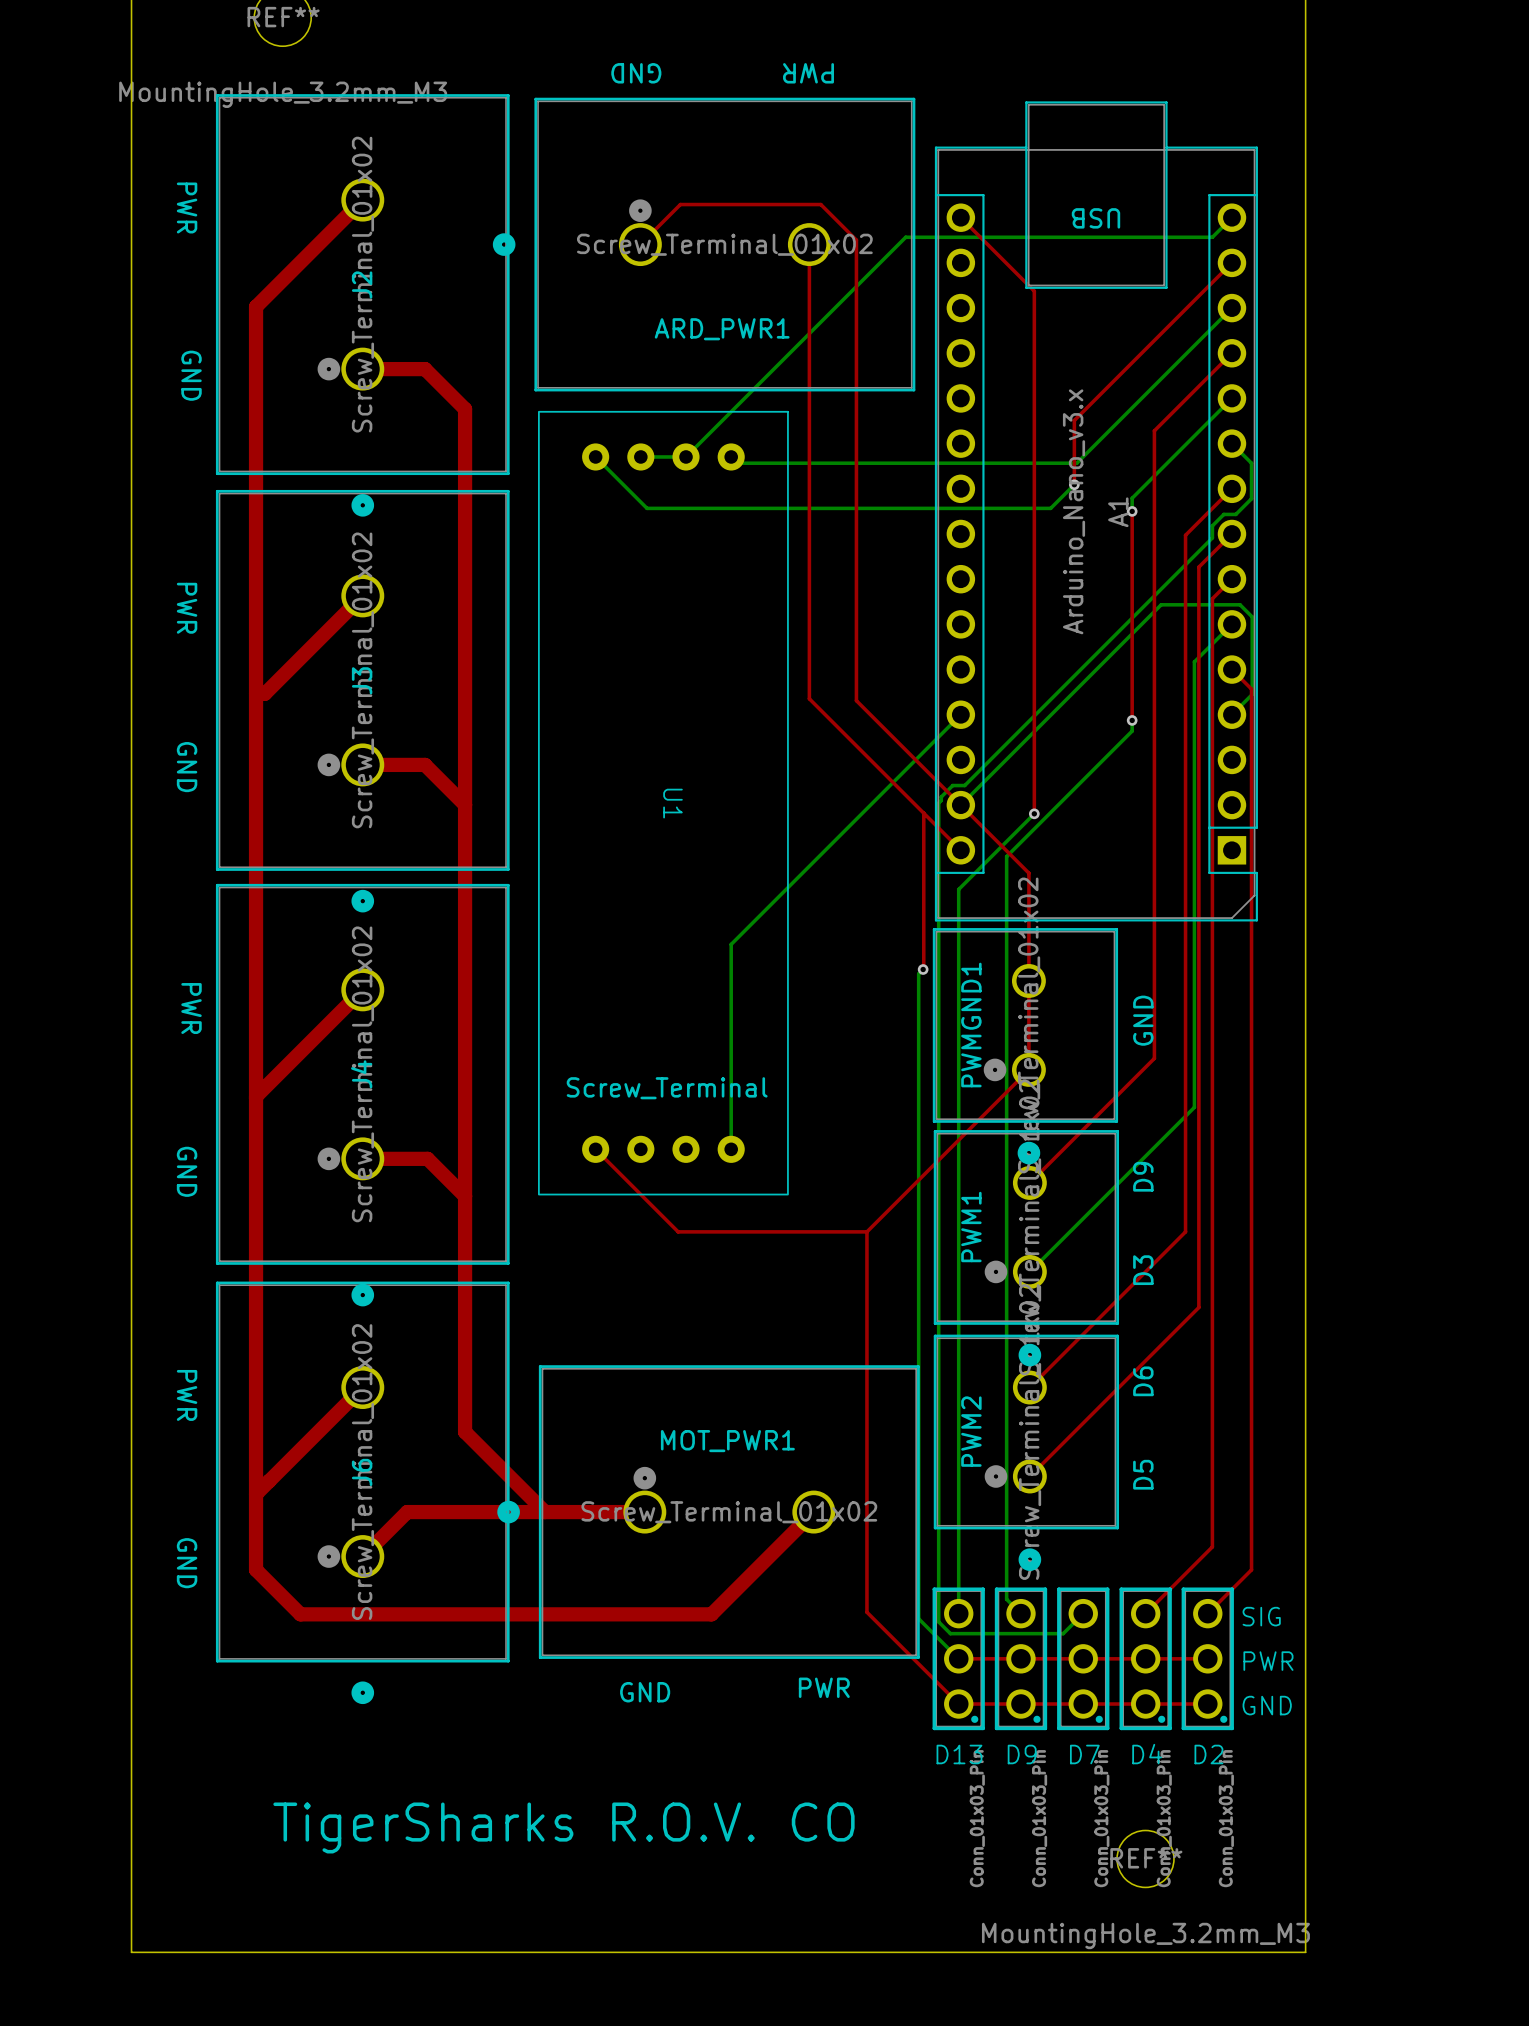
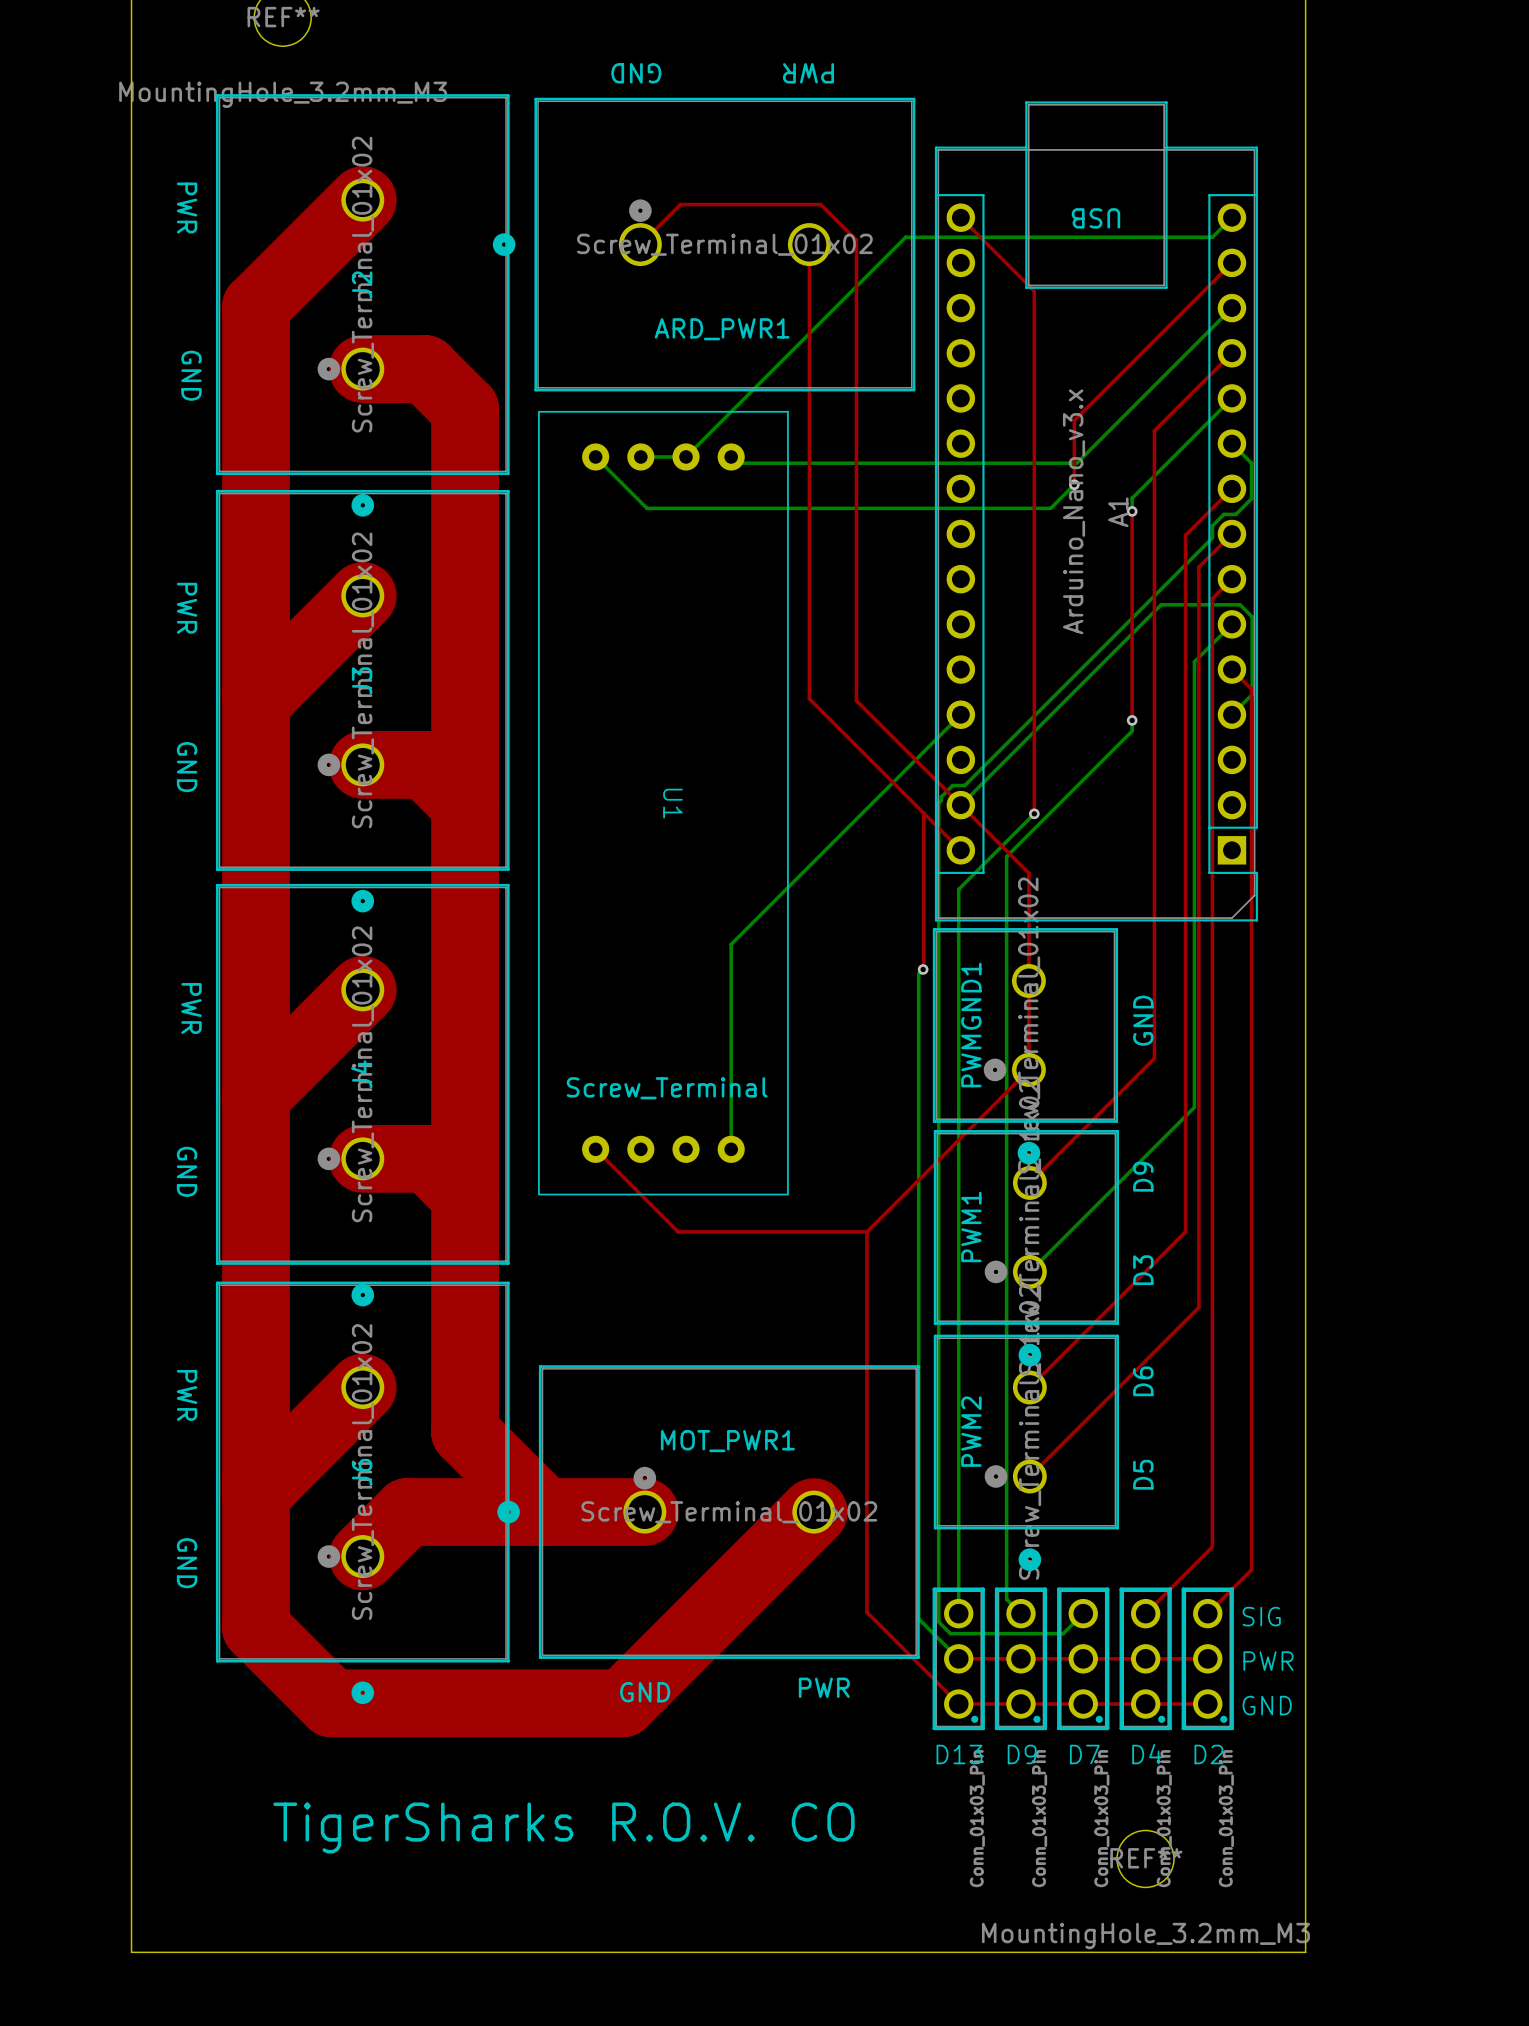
top track width: thin (362, 200) (256, 306) (256, 1569) -> thick (362, 200) (256, 306) (256, 1569)
top track width: thin (362, 369) (425, 369) (465, 409) (465, 1432) (545, 1512) -> thick (362, 369) (425, 369) (465, 409) (465, 1432) (545, 1512)
top track width: thin (362, 595) (264, 693) (256, 693) -> thick (362, 595) (264, 693) (256, 693)
top track width: thin (362, 764) (425, 764) (465, 804) -> thick (362, 764) (425, 764) (465, 804)
top track width: thin (362, 989) (256, 1096) -> thick (362, 989) (256, 1096)
top track width: thin (362, 1158) (427, 1158) (465, 1196) -> thick (362, 1158) (427, 1158) (465, 1196)
top track width: thin (362, 1387) (256, 1494) -> thick (362, 1387) (256, 1494)
top track width: thin (644, 1512) (407, 1512) (362, 1556) -> thick (644, 1512) (407, 1512) (362, 1556)
top track width: thin (813, 1512) (711, 1614) -> thick (813, 1512) (711, 1614)
top track: (256, 1569) (300, 1614) (711, 1614) -> (256, 1569) (256, 1627) (331, 1703) (622, 1703) (711, 1614)

